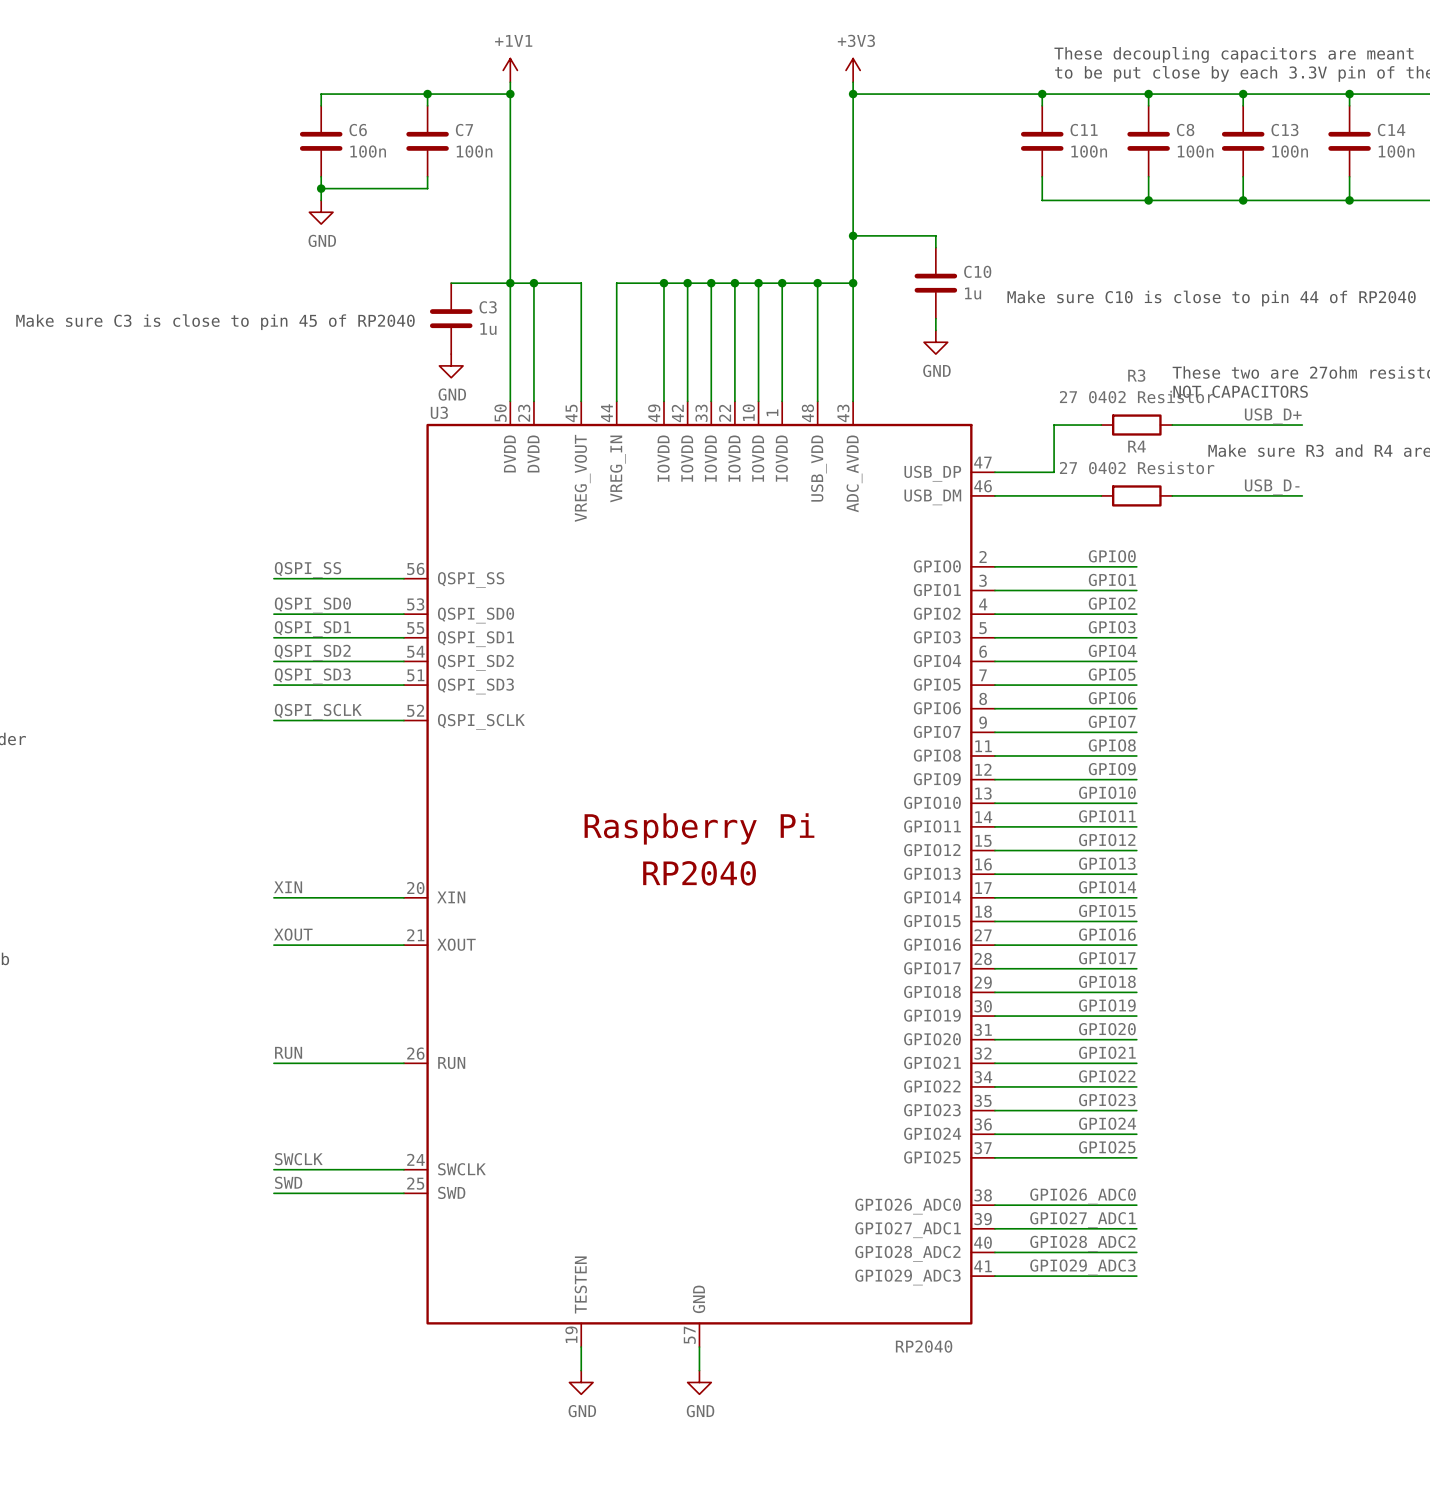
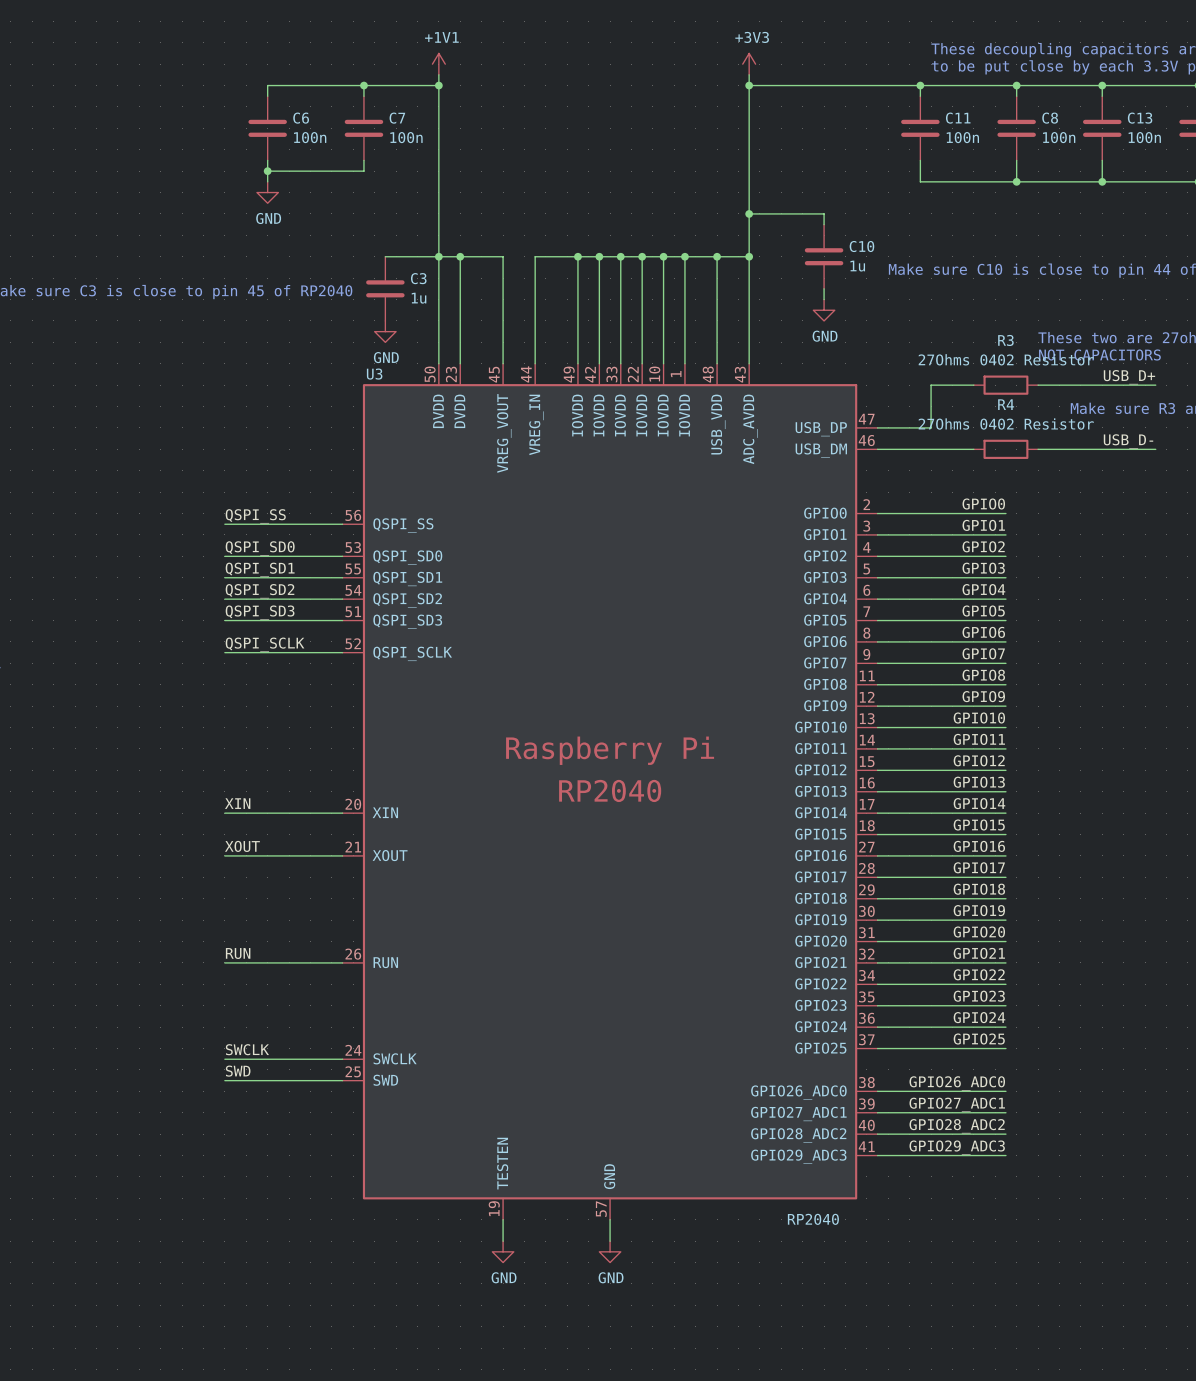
R3 value: 27 0402 Resistor (1137, 397) -> 27Ohms 0402 Resistor (1006, 359)
R4 value: 27 0402 Resistor (1137, 467) -> 27Ohms 0402 Resistor (1006, 424)

